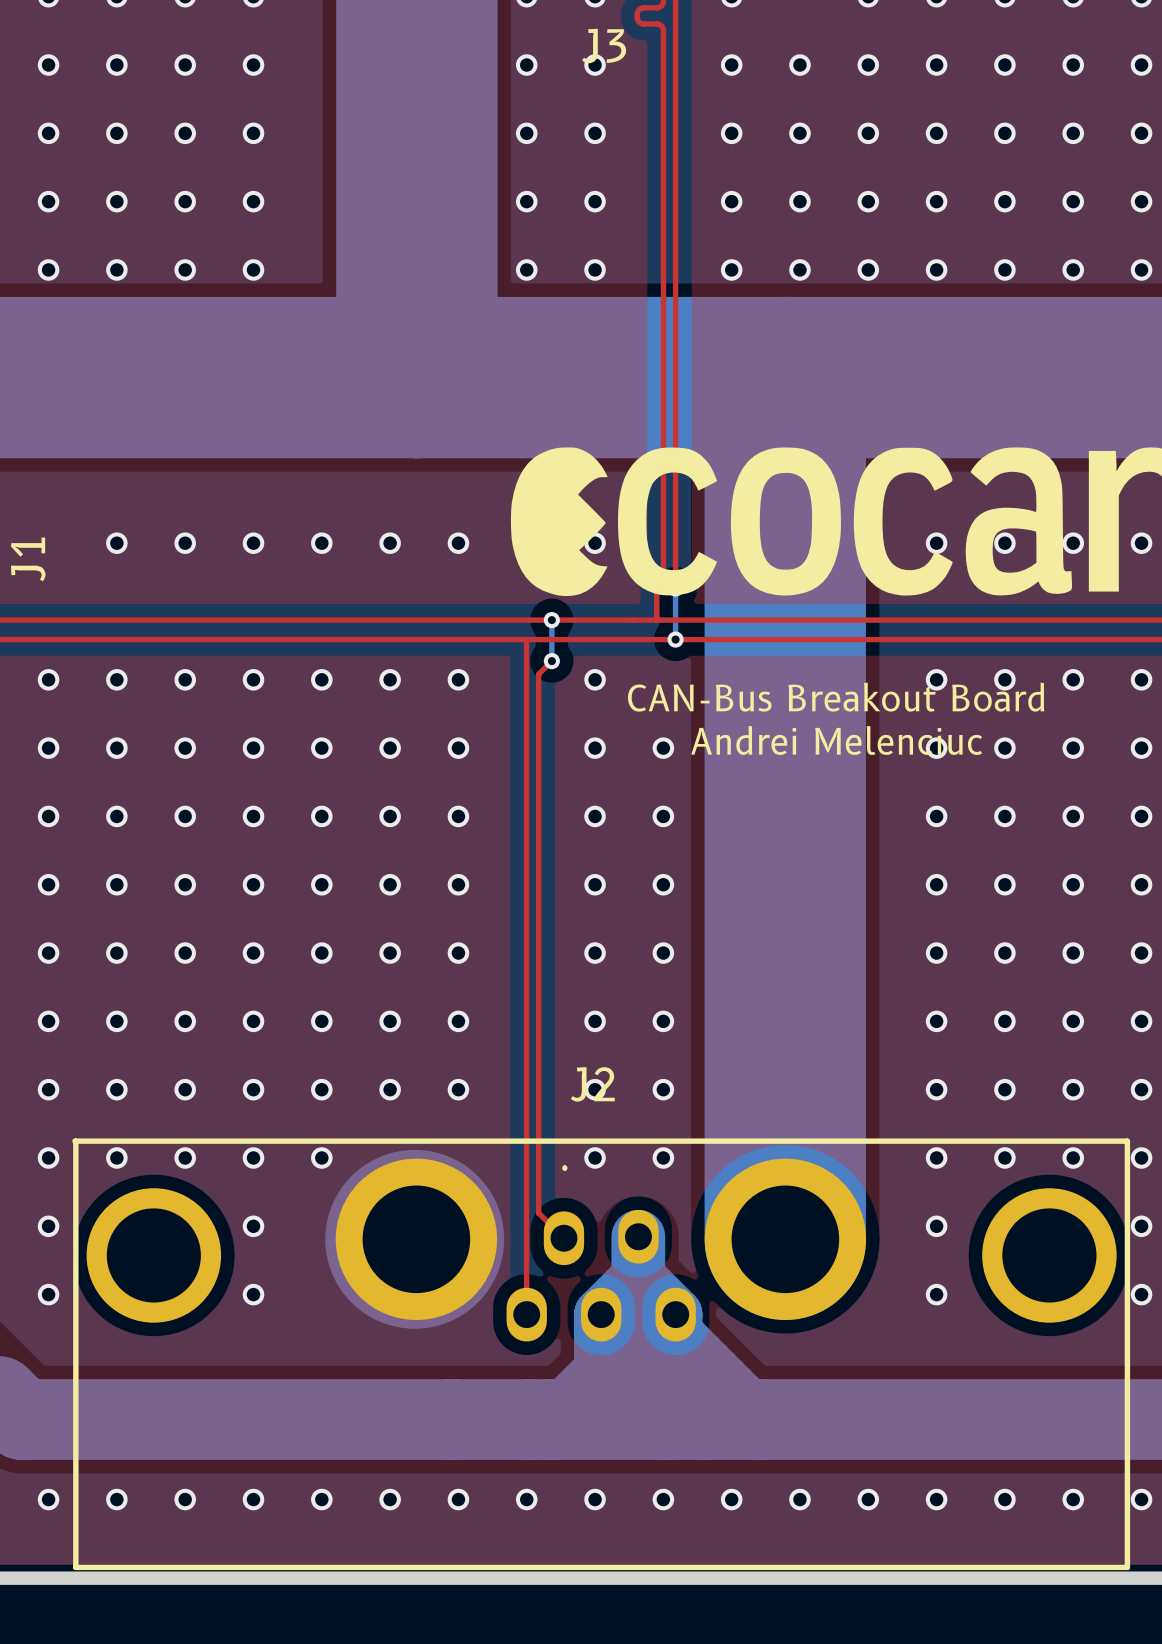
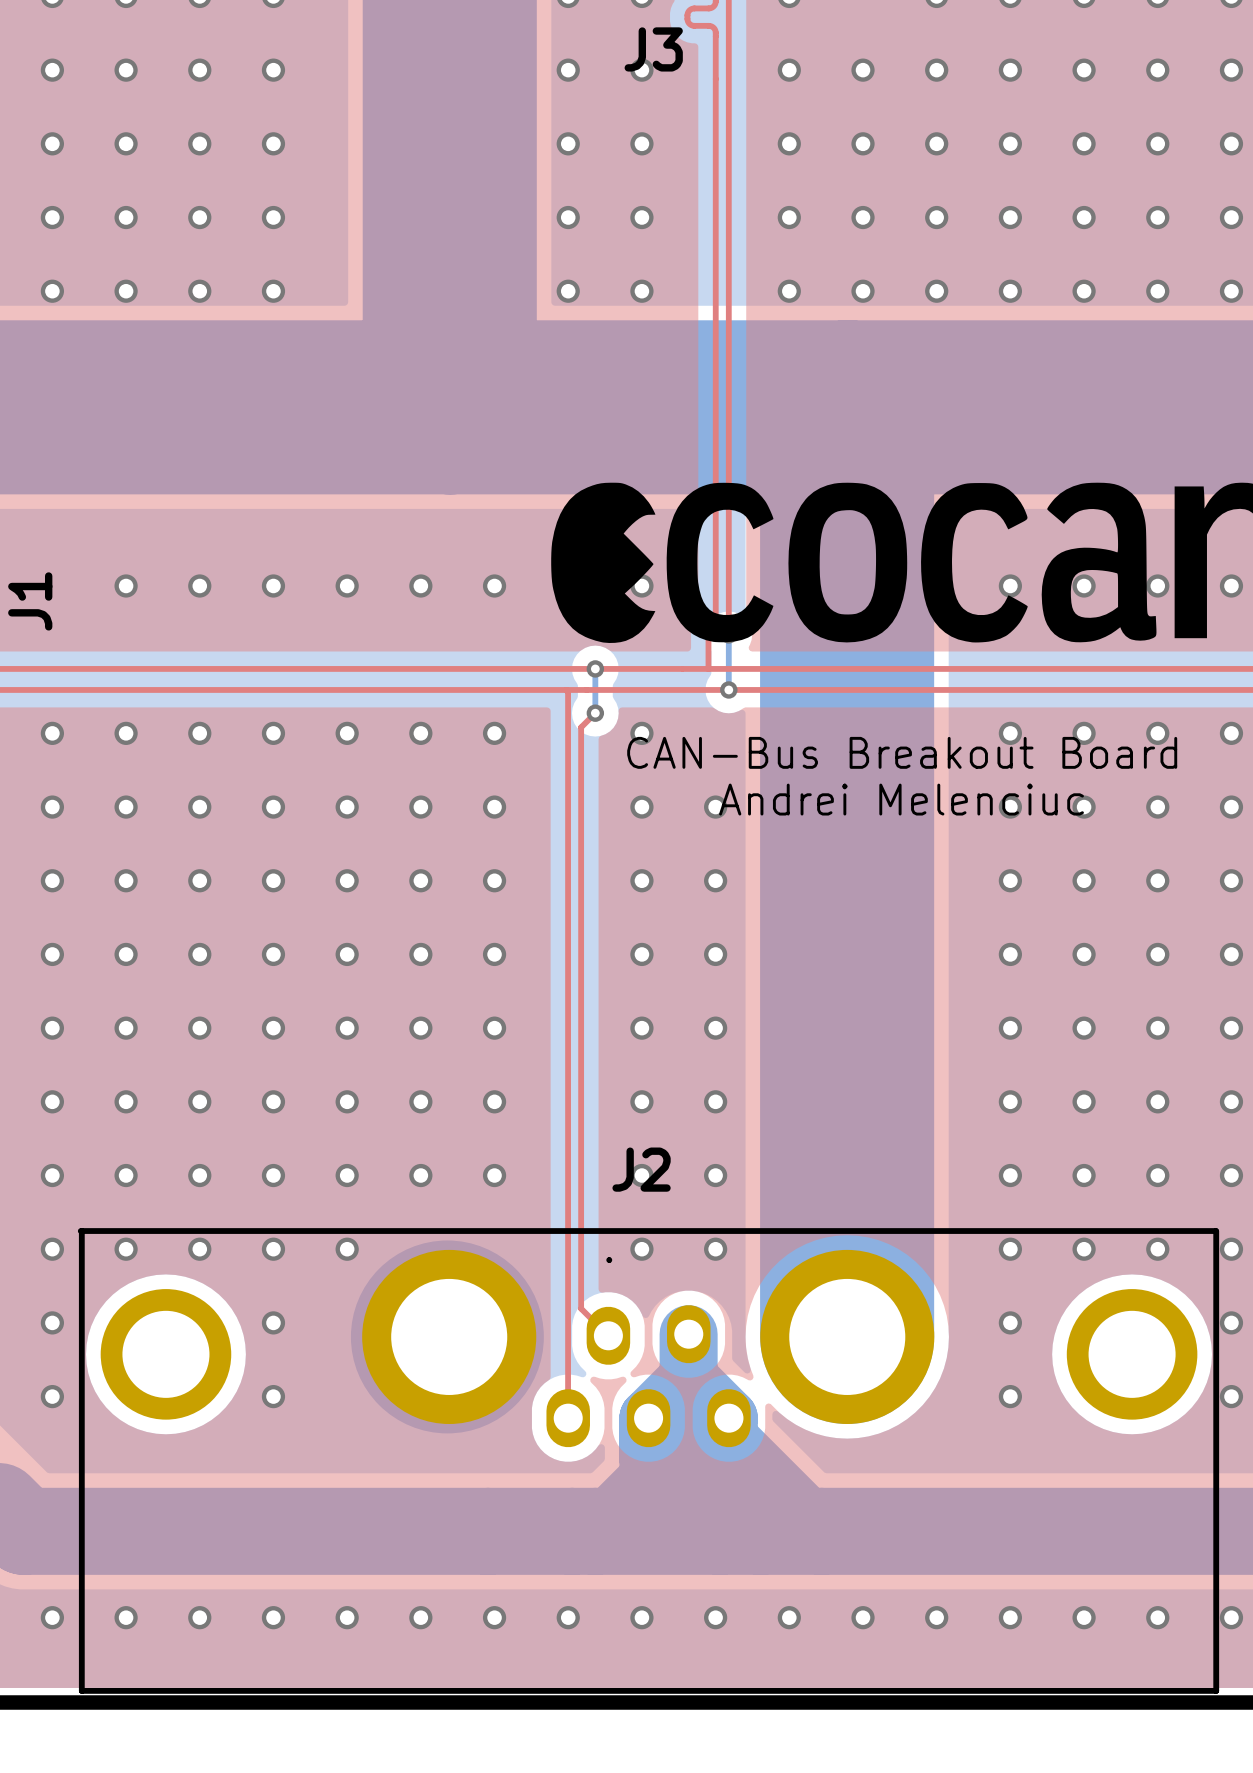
J2 footprint: [72, 1138, 1131, 1571] -> [77, 1228, 1220, 1694]

